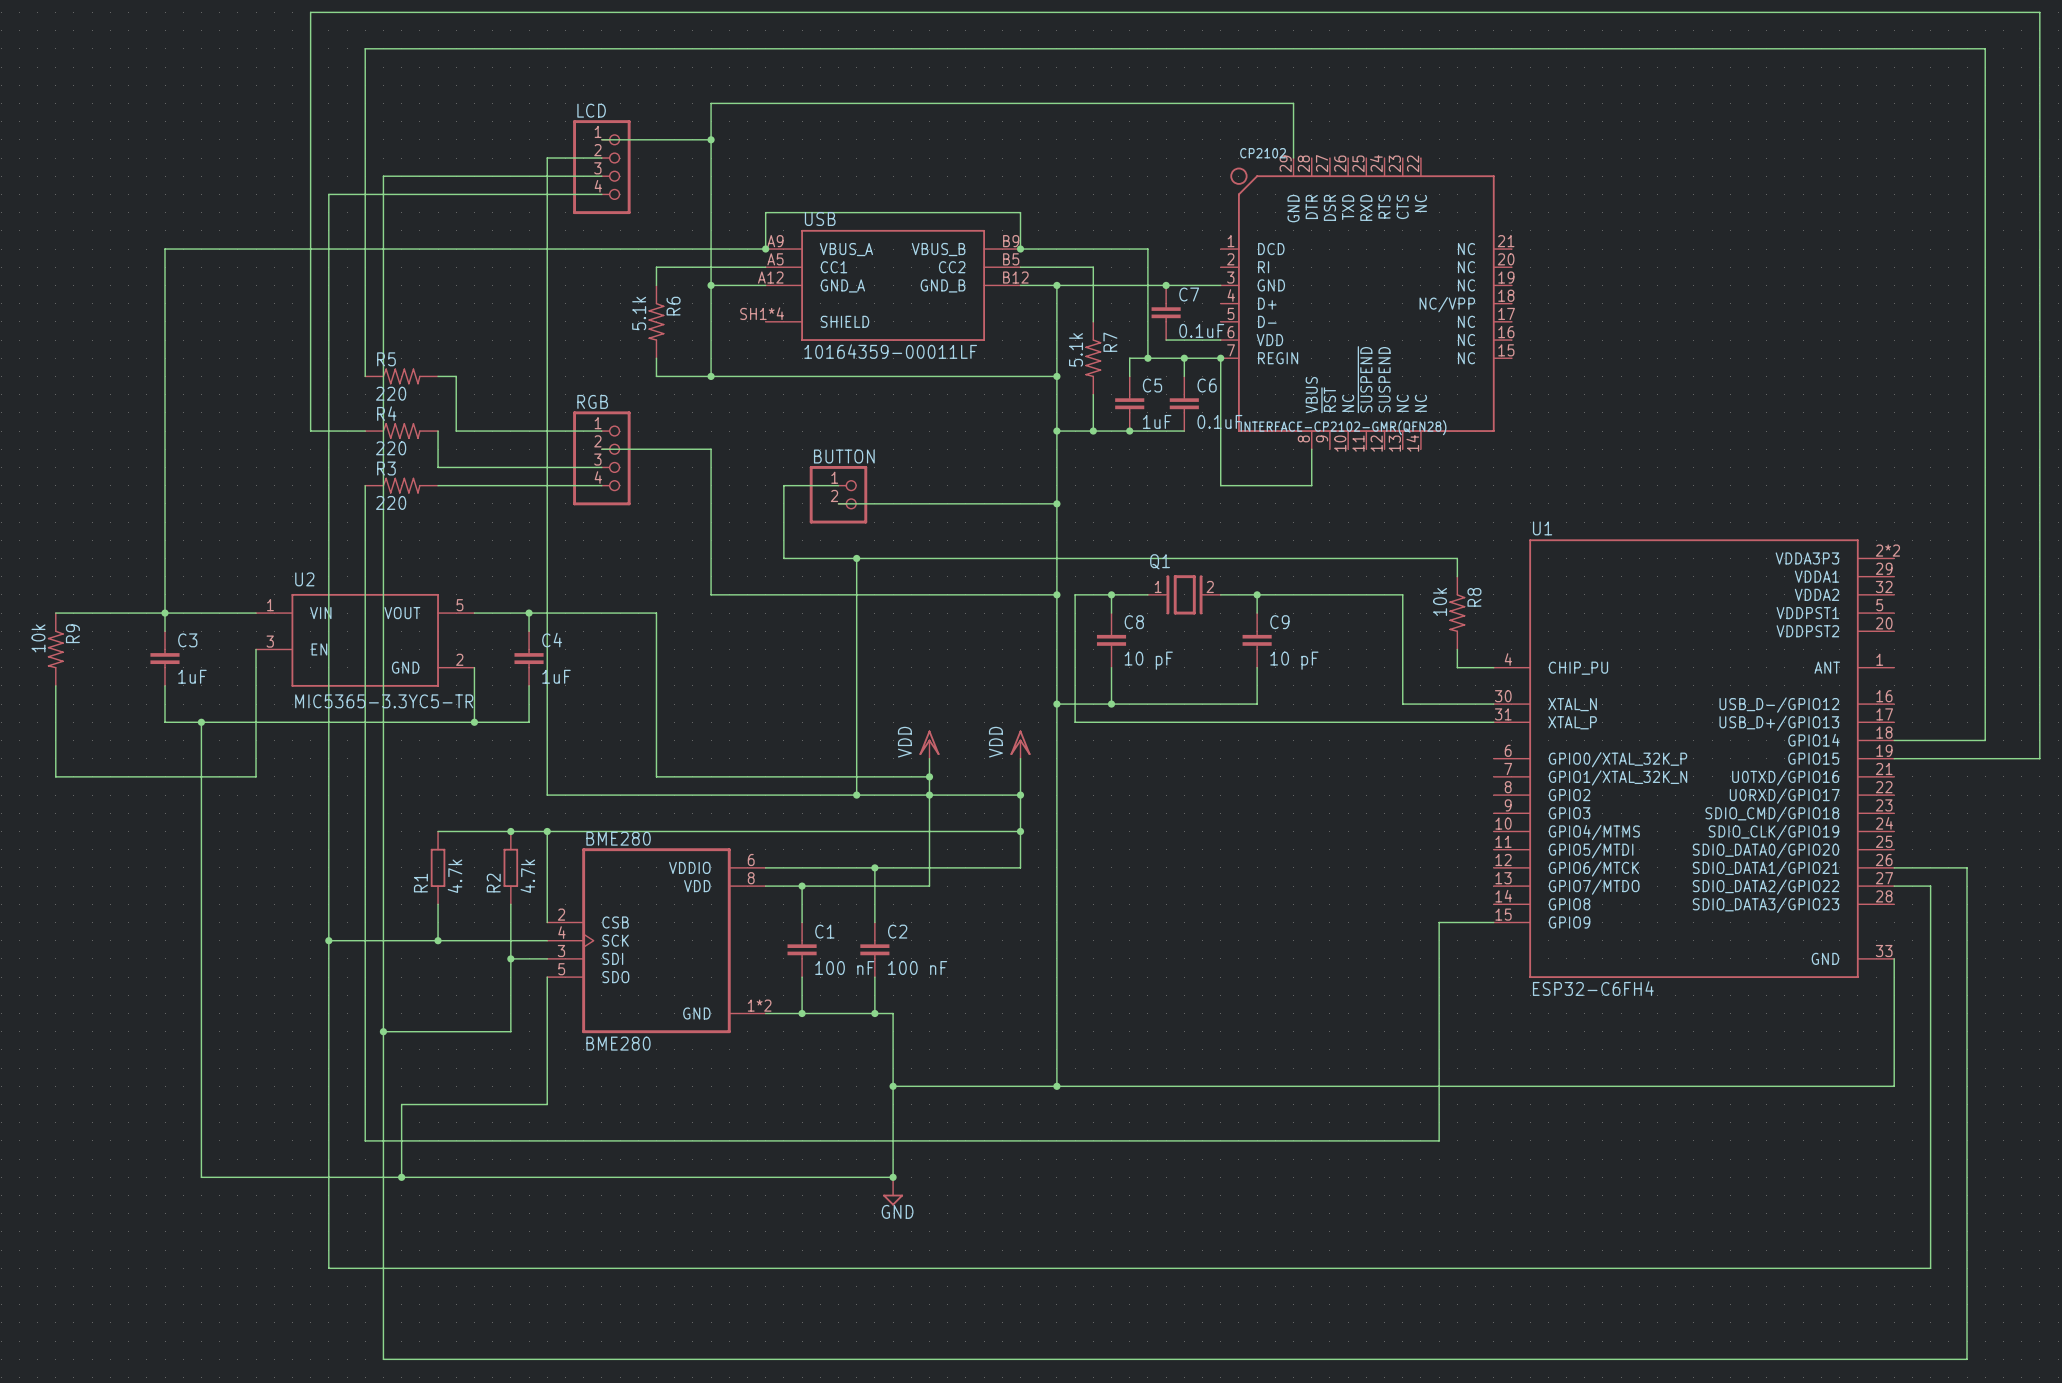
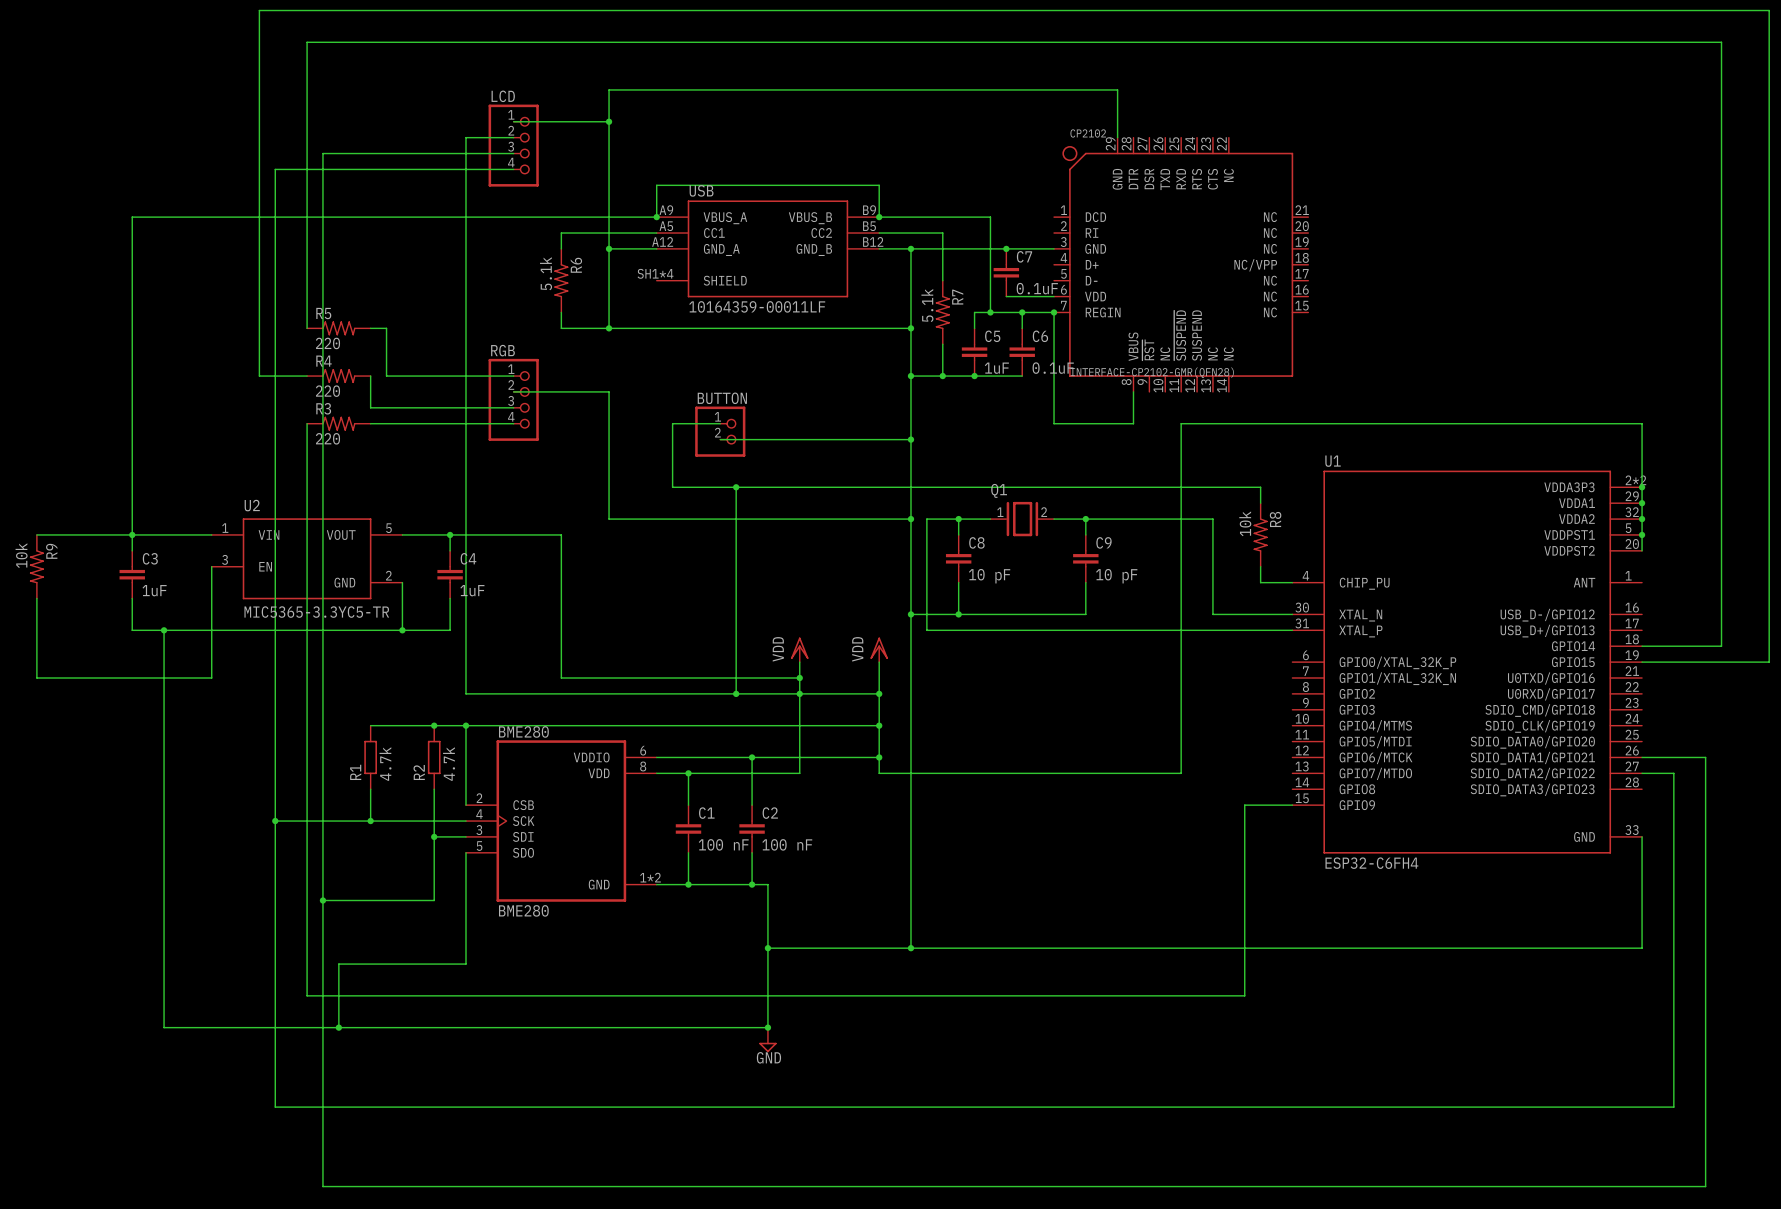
junction: none -> (1642, 487)
junction: none -> (1642, 503)
junction: none -> (1642, 519)
junction: none -> (1642, 534)
wire: none -> (1642, 550) (1642, 423) (1181, 423) (1181, 773) (879, 773) (879, 757)
junction: none -> (879, 757)

